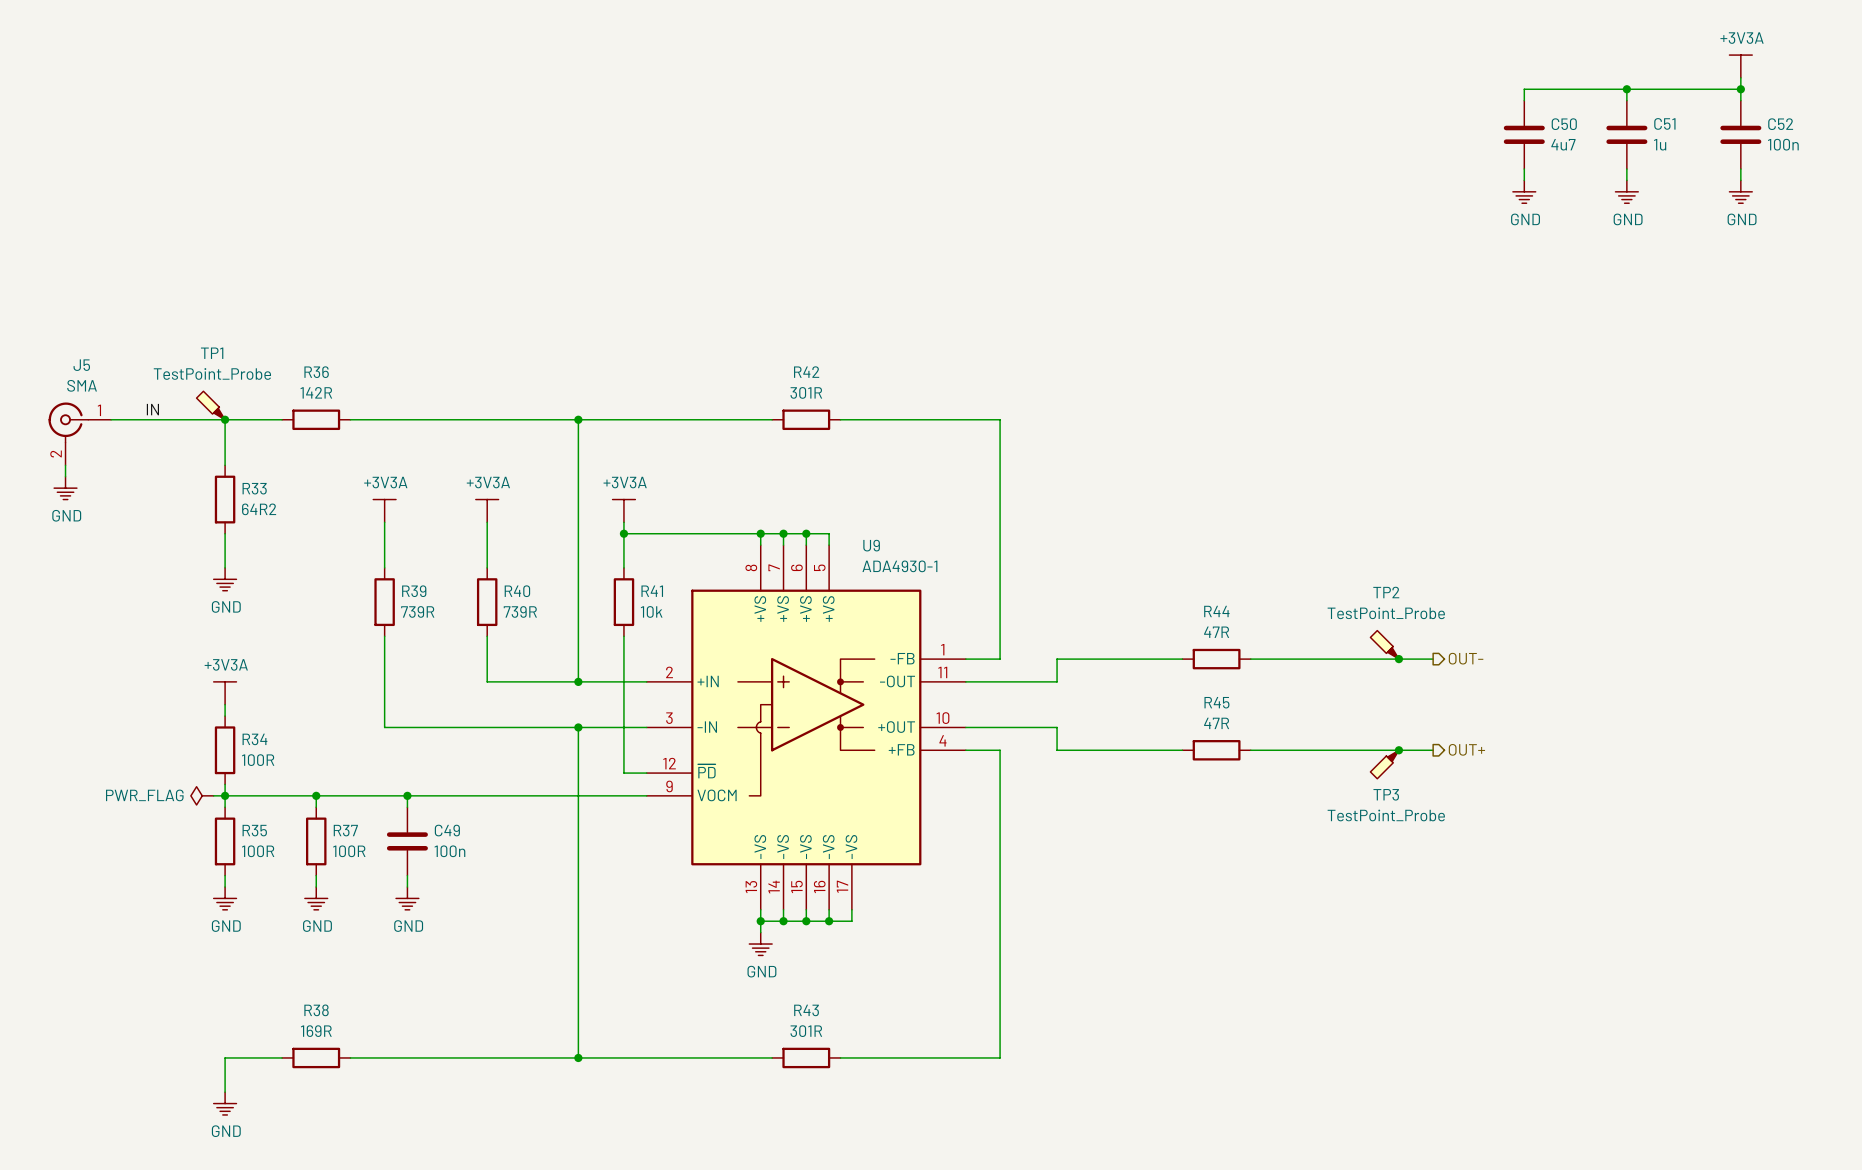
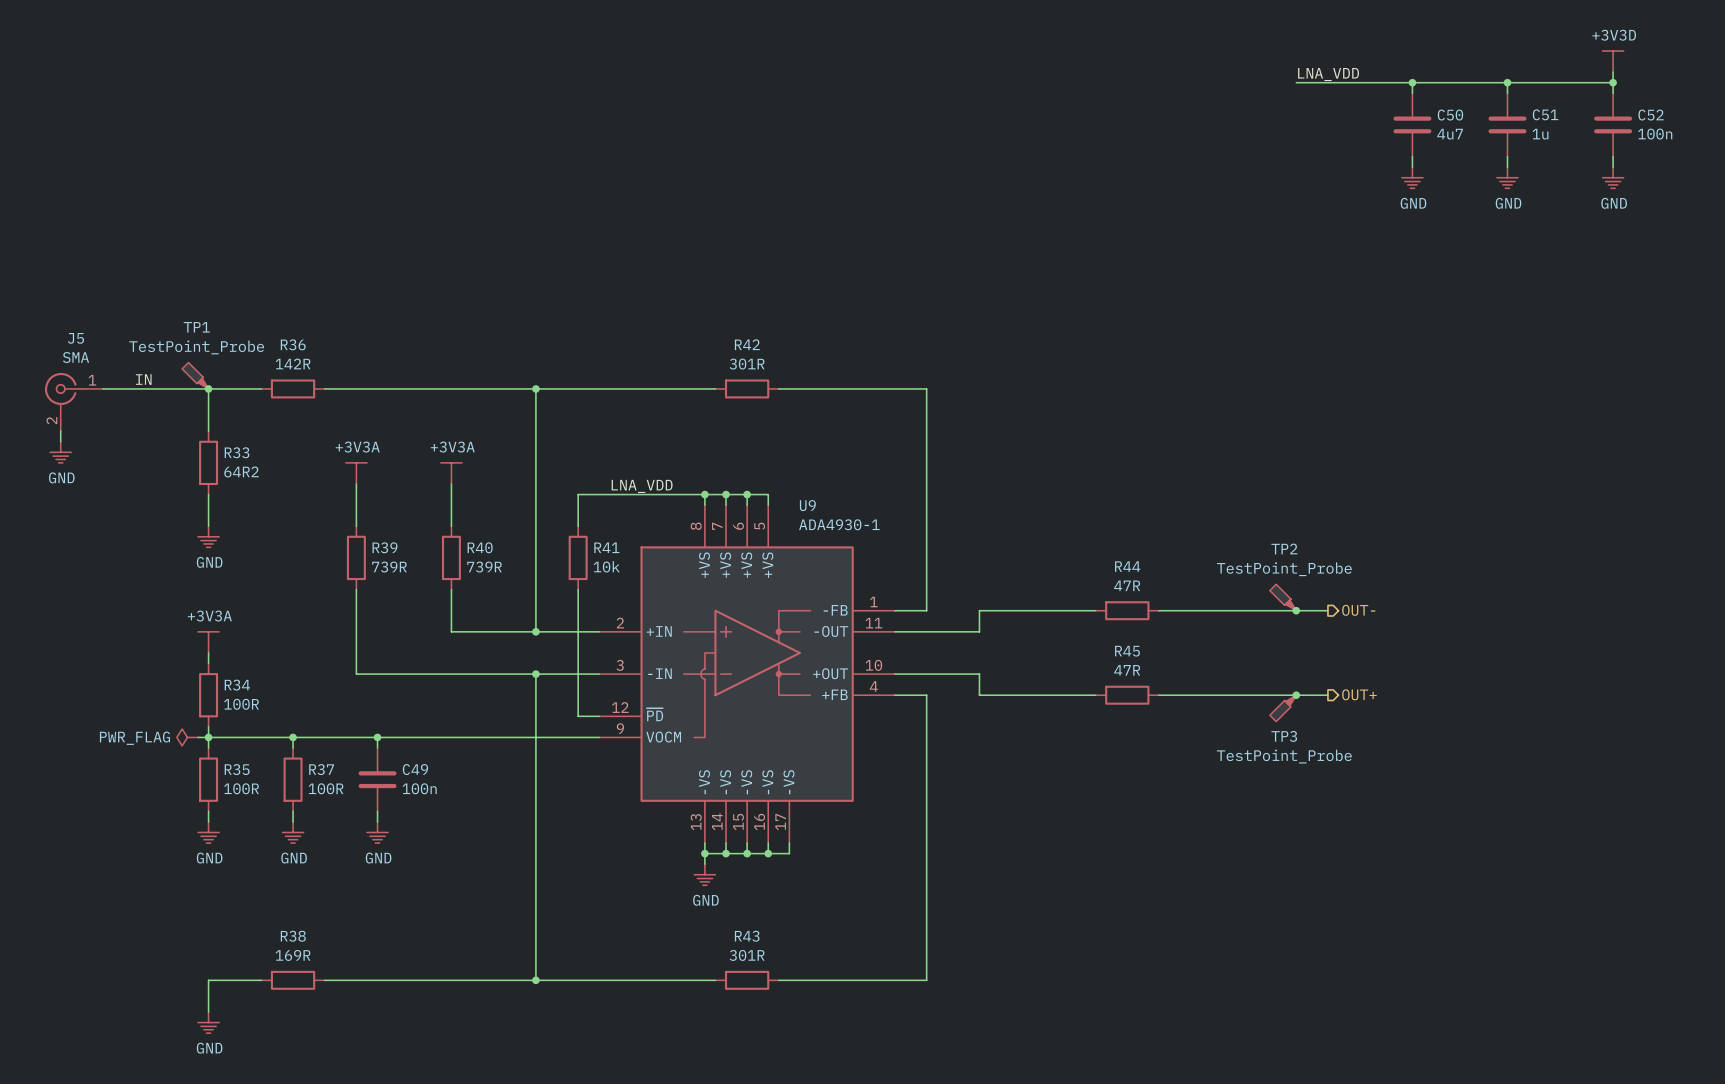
power symbol: +3V3A (1740, 66) -> +3V3D (1613, 61)
label: none -> LNA_VDD (1328, 74)
wire: none -> (1296, 82) (1412, 82)
junction: none -> (1412, 82)
power symbol: +3V3A (623, 510) -> none
wire: (623, 522) (623, 533) -> none
label: none -> LNA_VDD (642, 486)
junction: (623, 533) -> none

